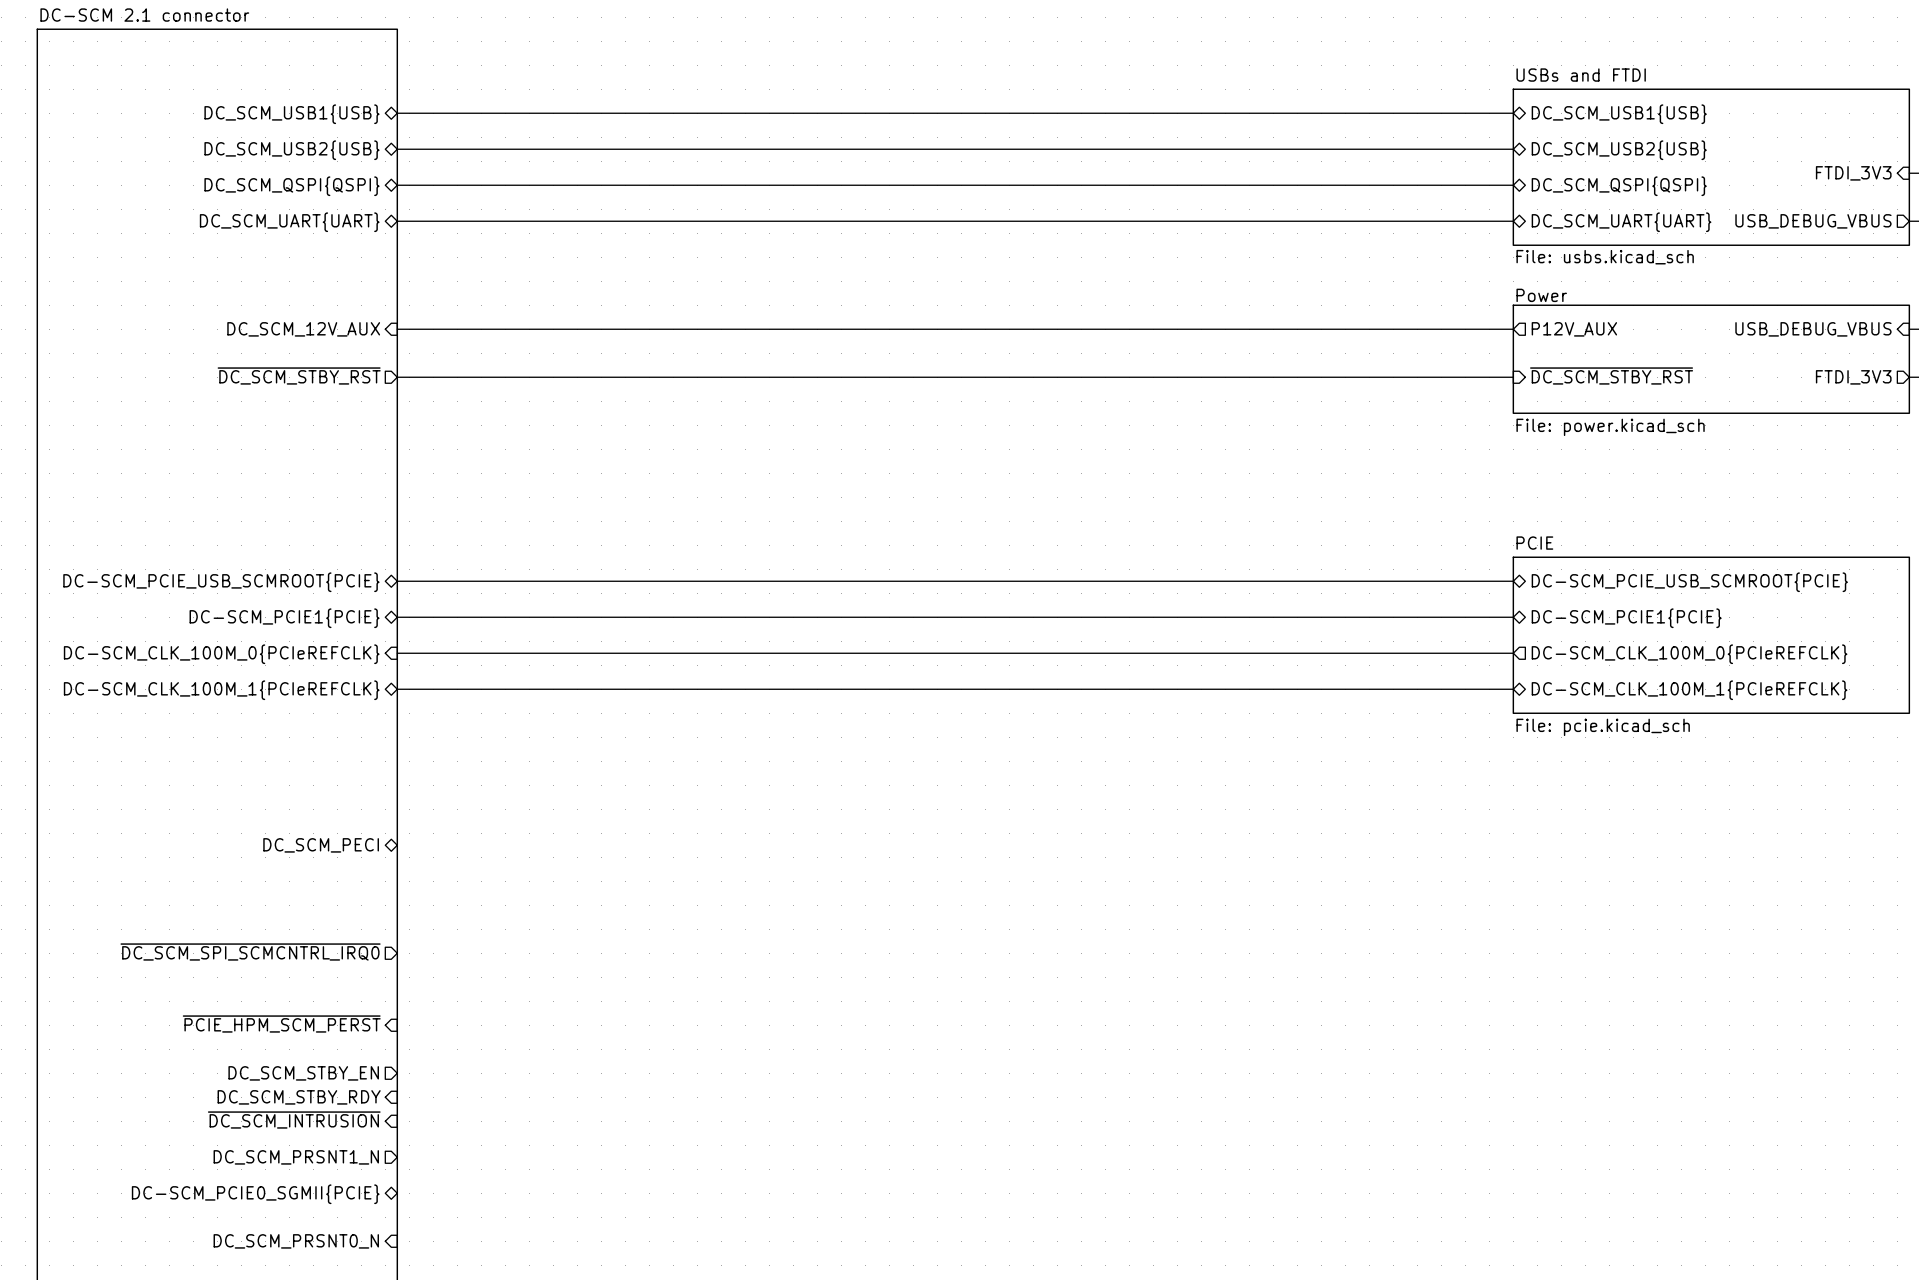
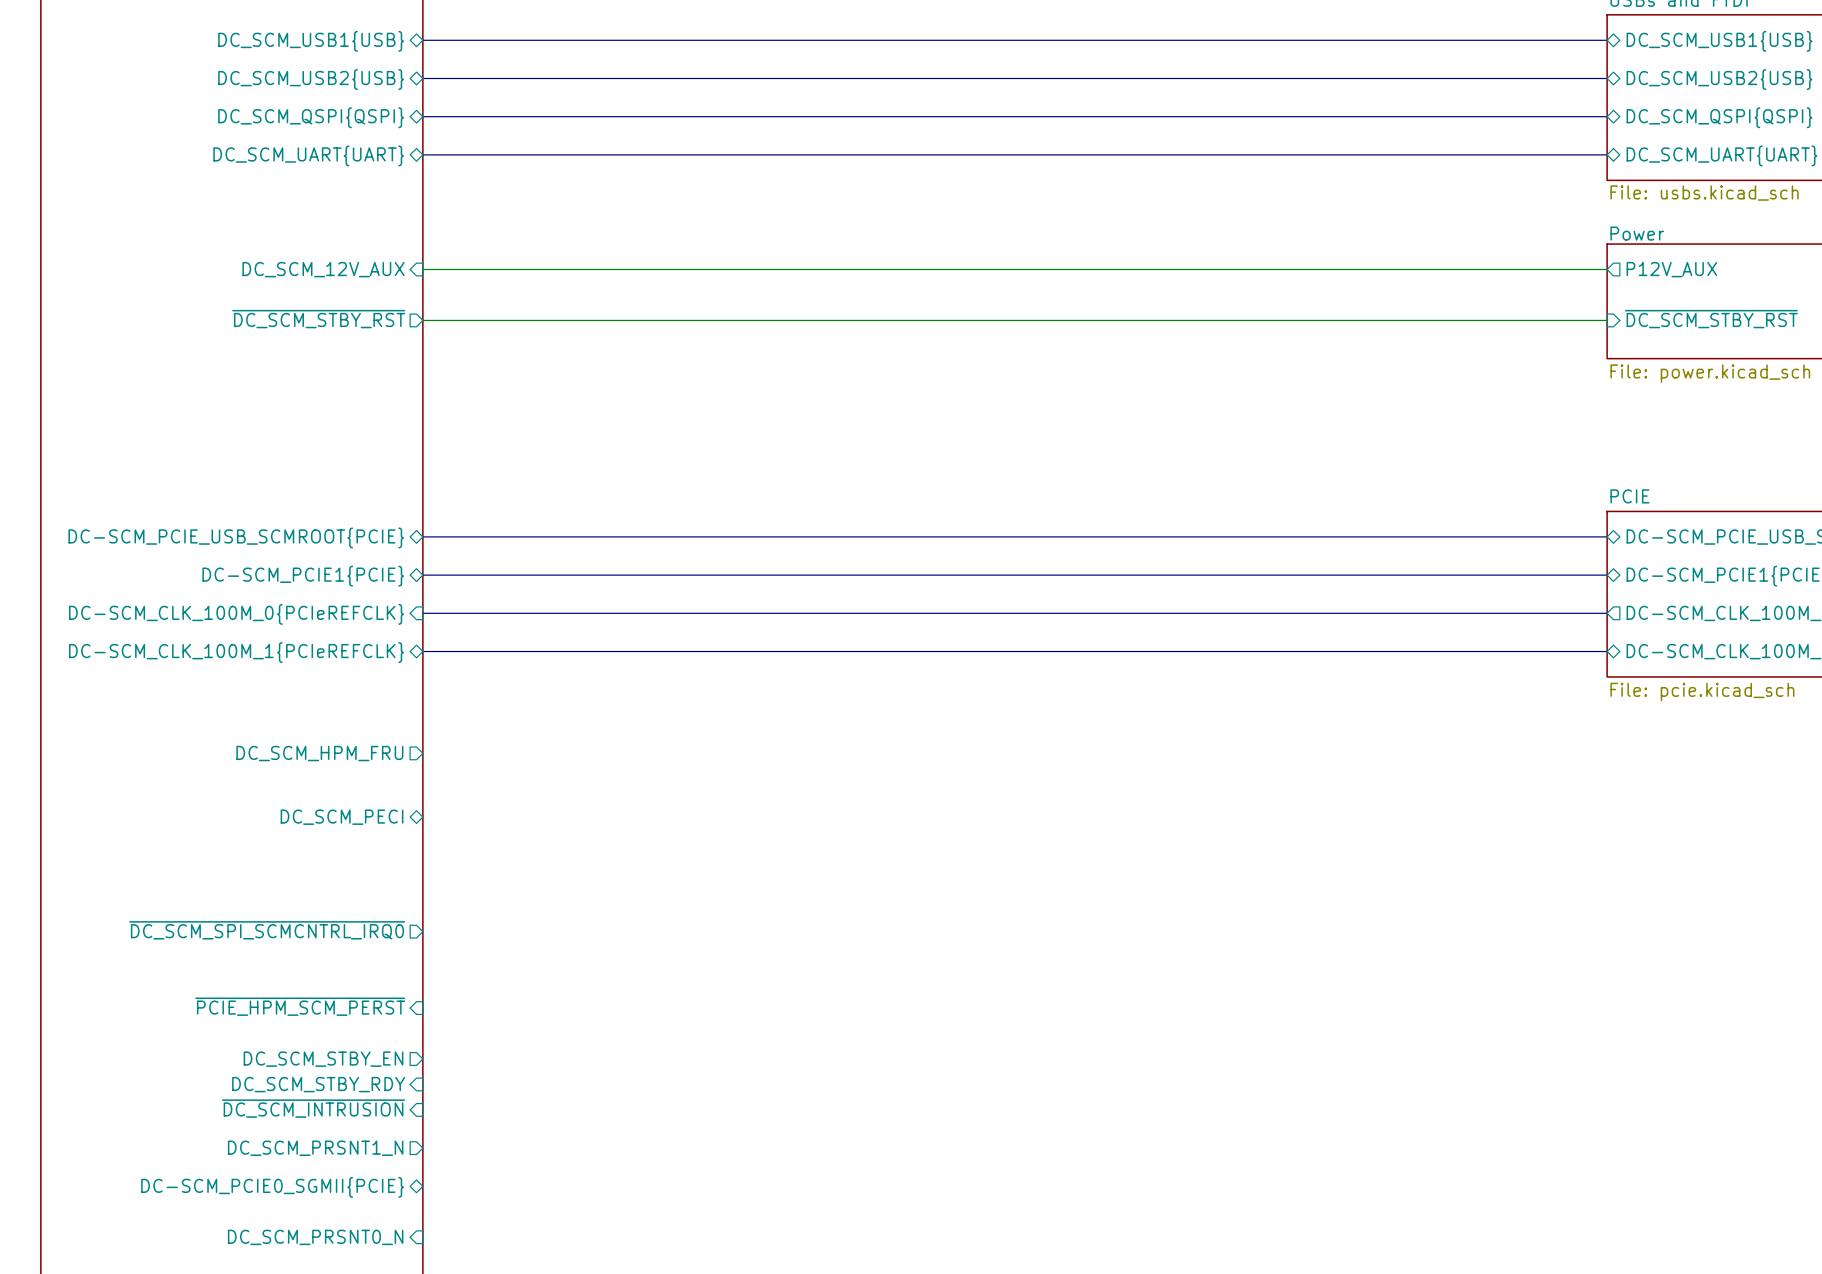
sheet pin: none -> DC_SCM_HPM_FRU (319, 753)

